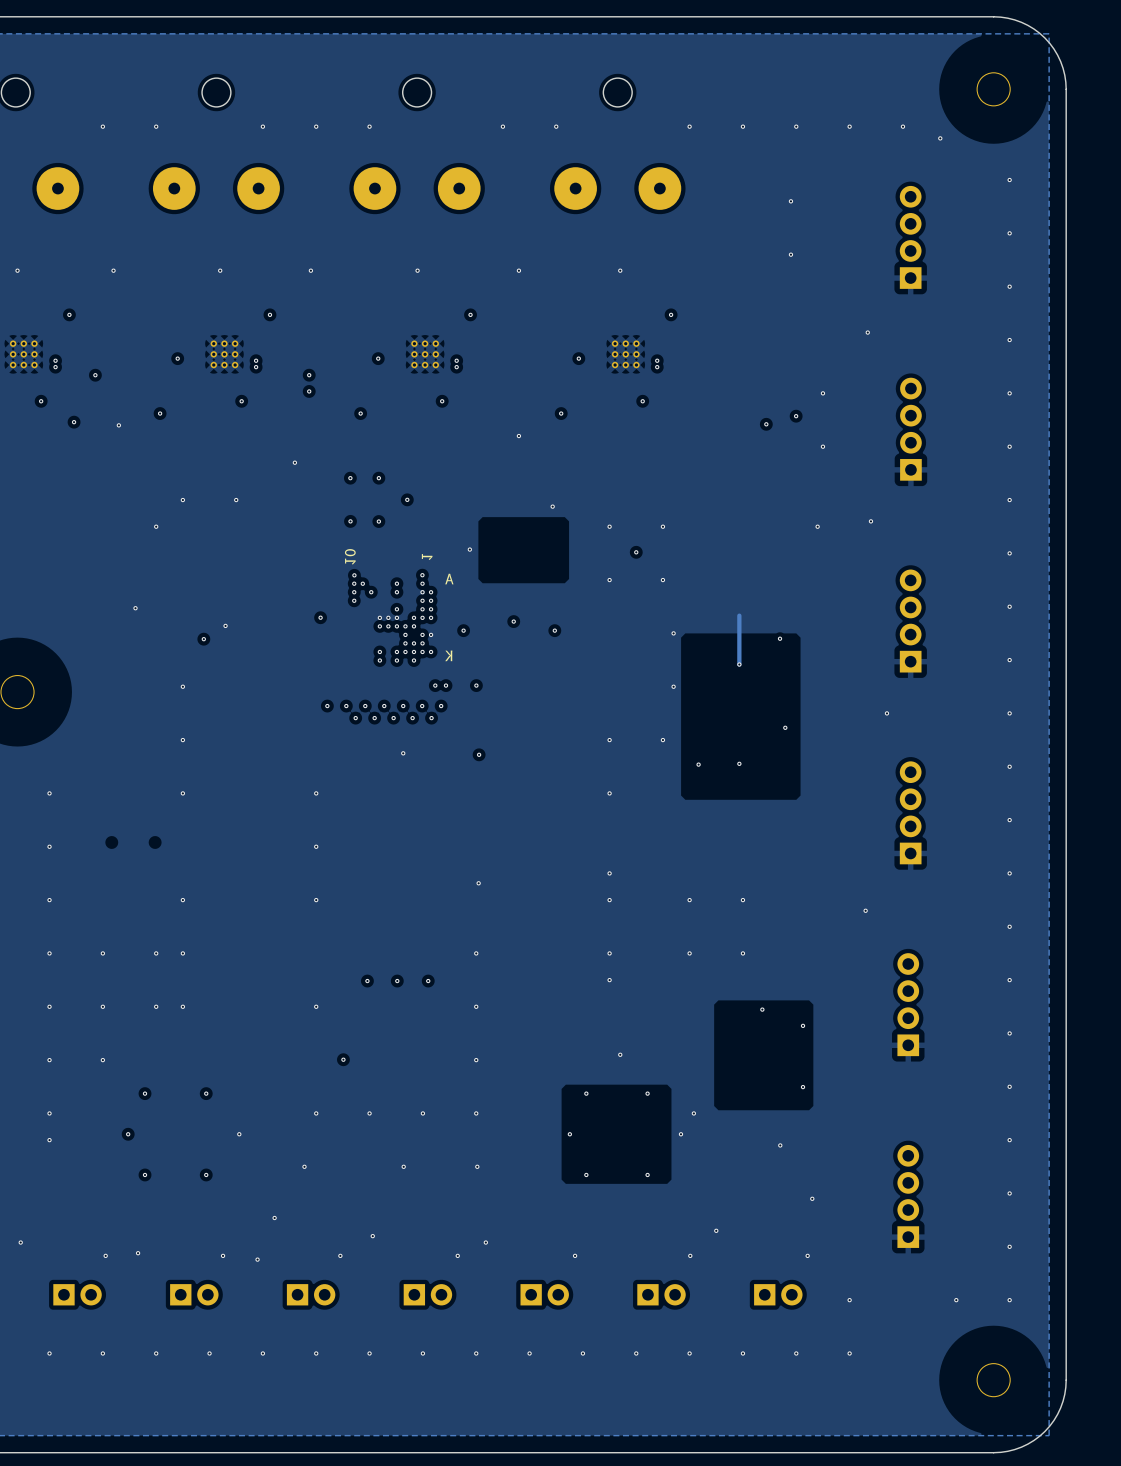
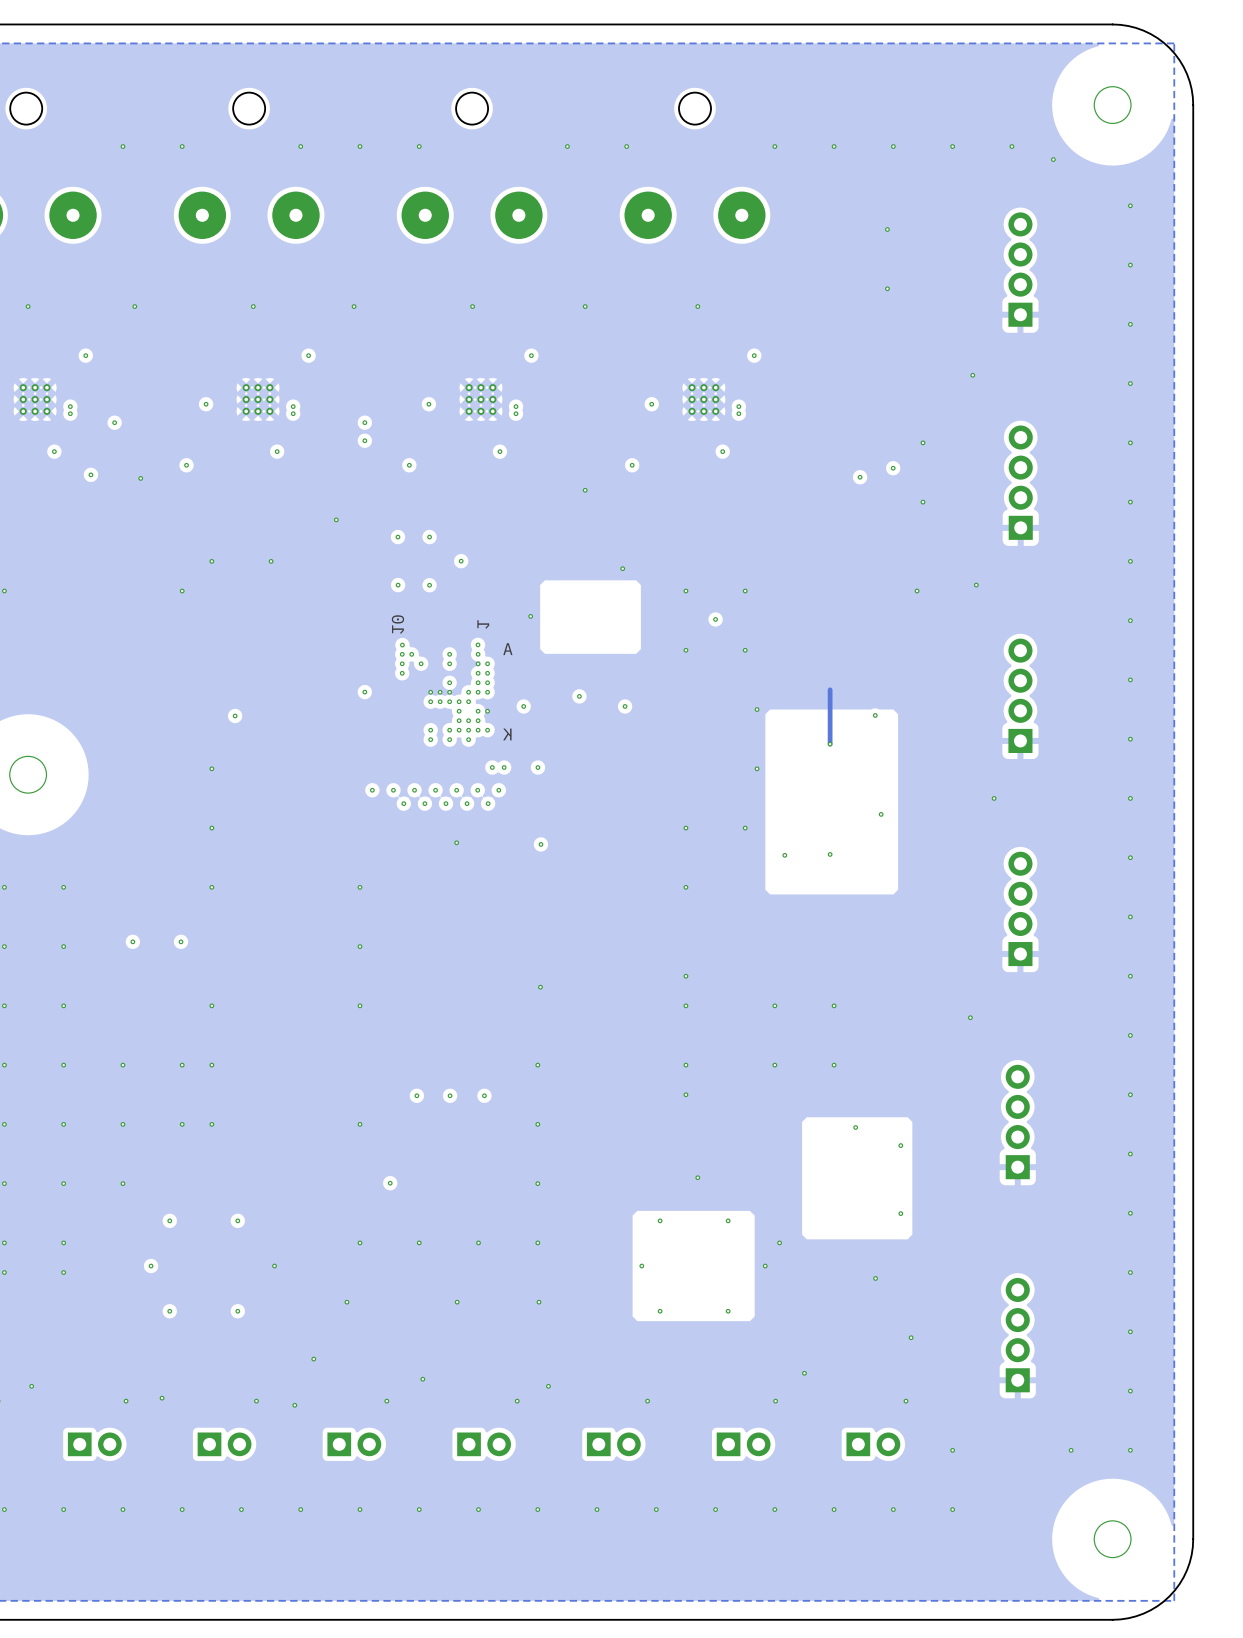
via: (309, 375) -> none
via: none -> (364, 422)
via: (309, 391) -> none
via: none -> (364, 440)
via: (135, 608) -> none
via: (225, 625) -> none
via: none -> (132, 941)
via: none -> (181, 941)

